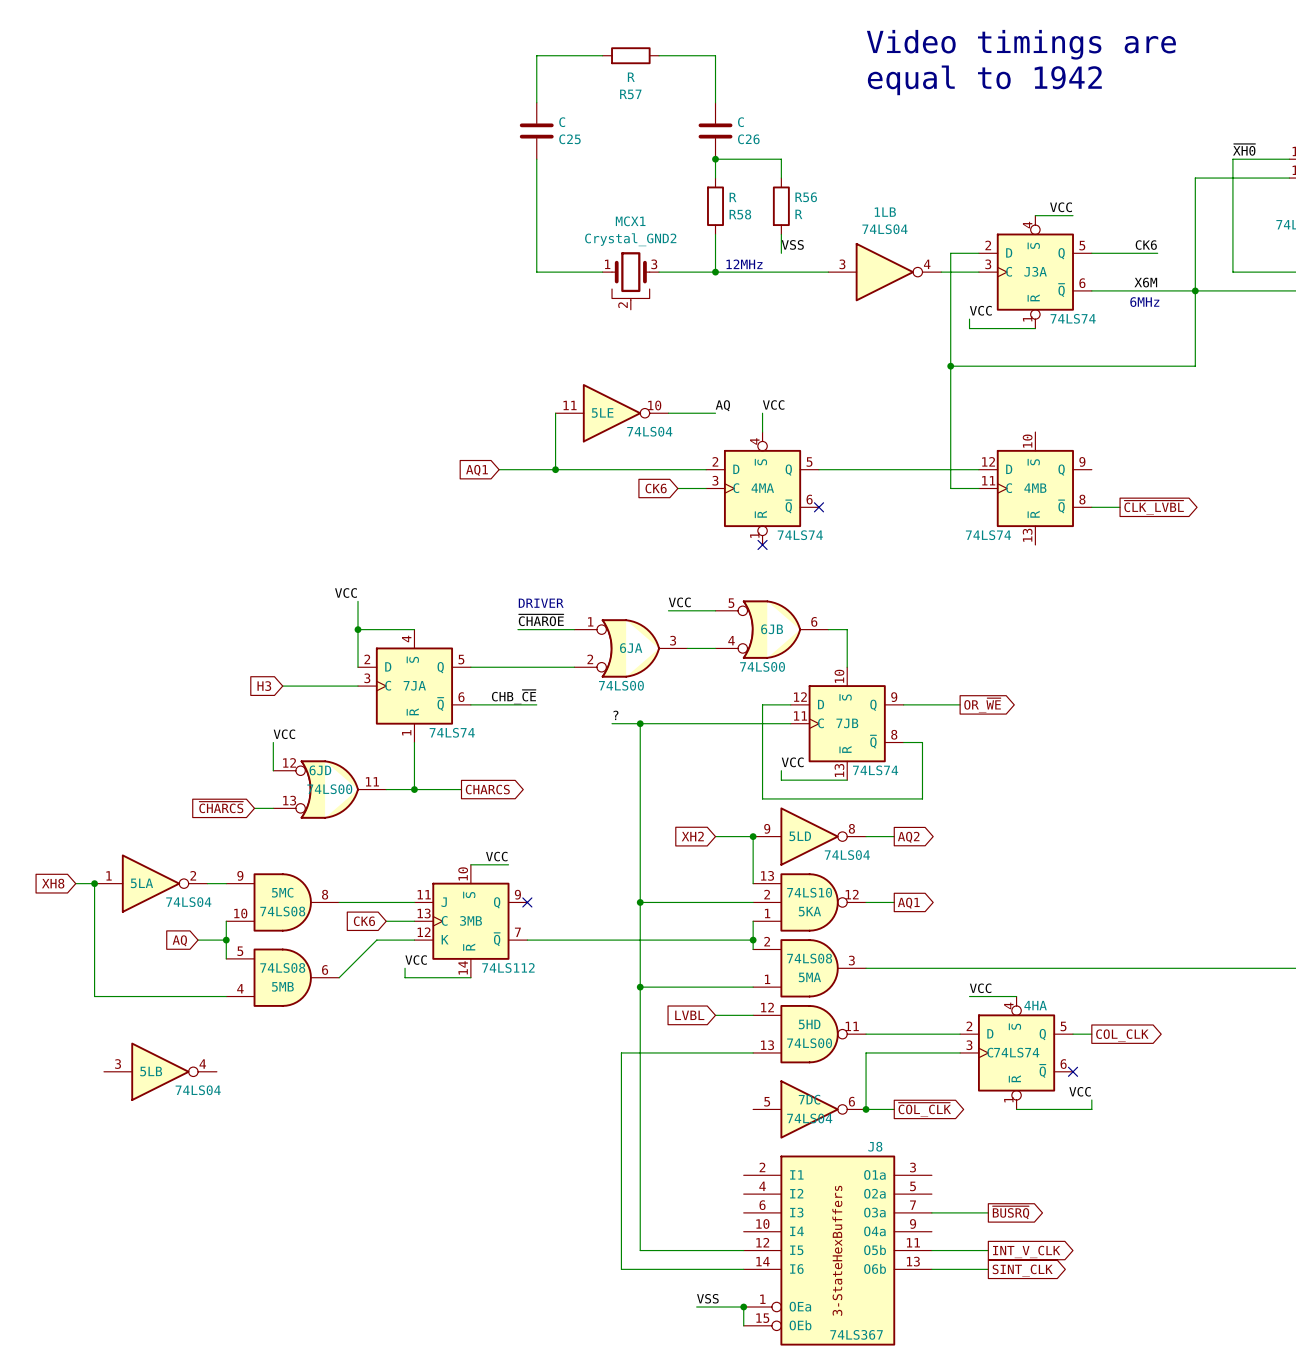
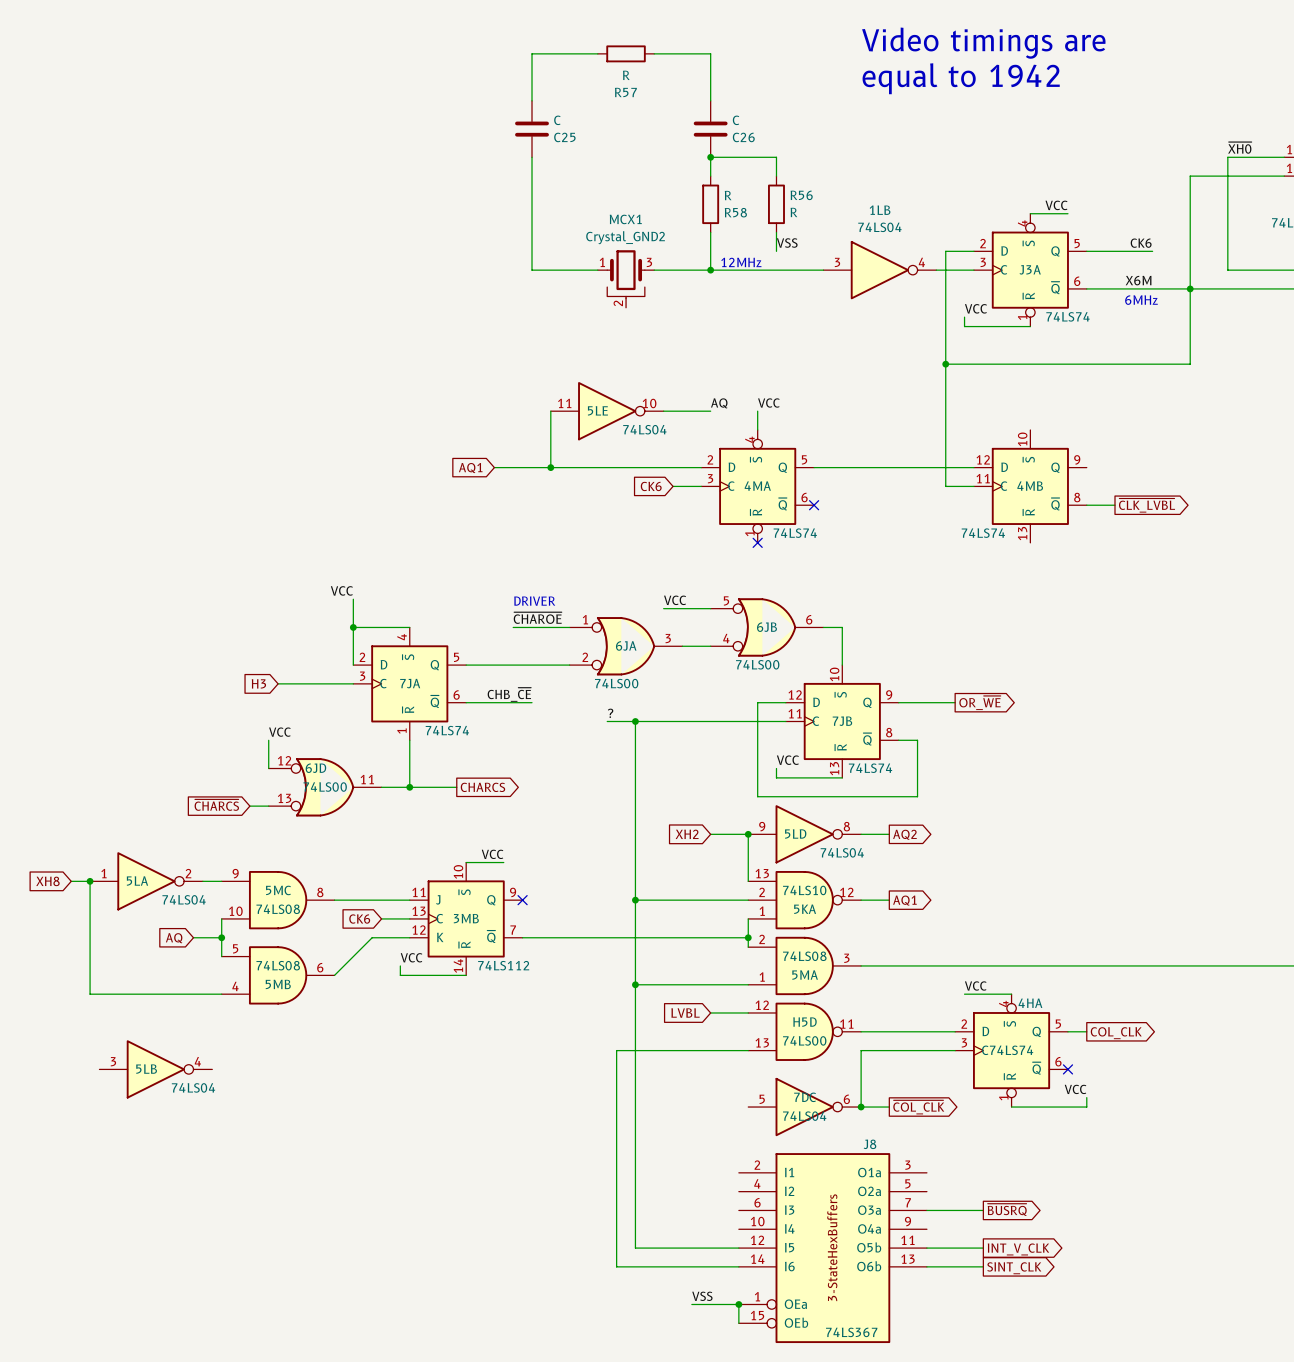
5HD name: 5HD (809, 1024) -> H5D (804, 1022)

